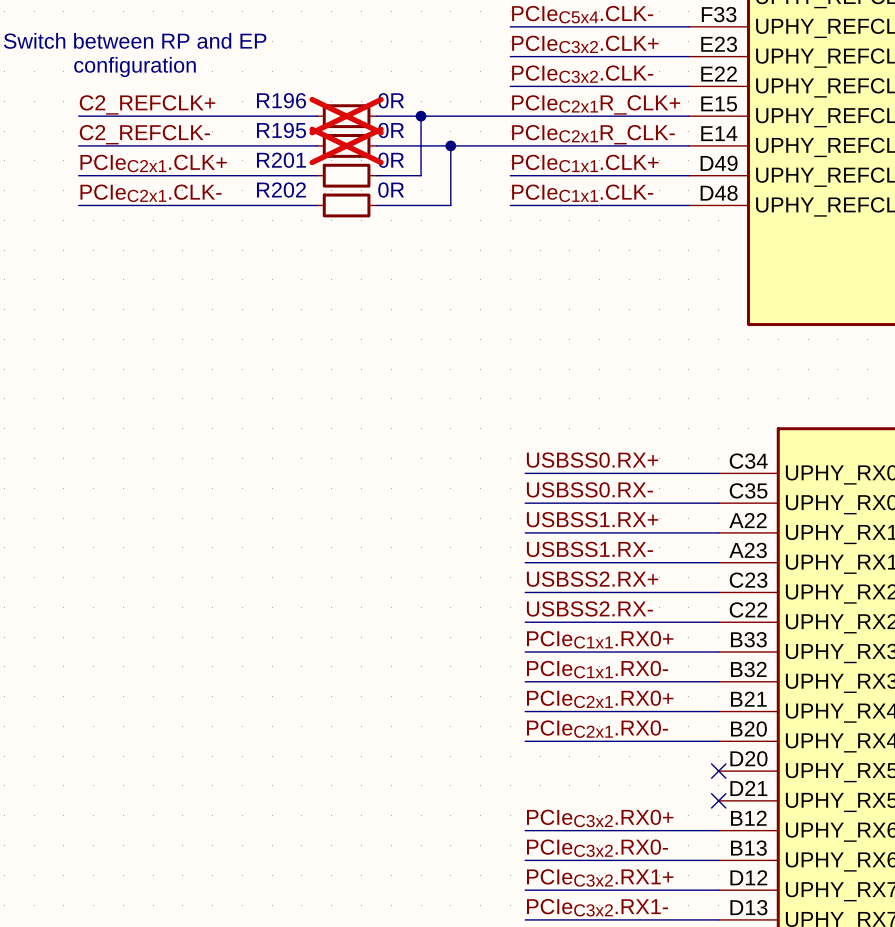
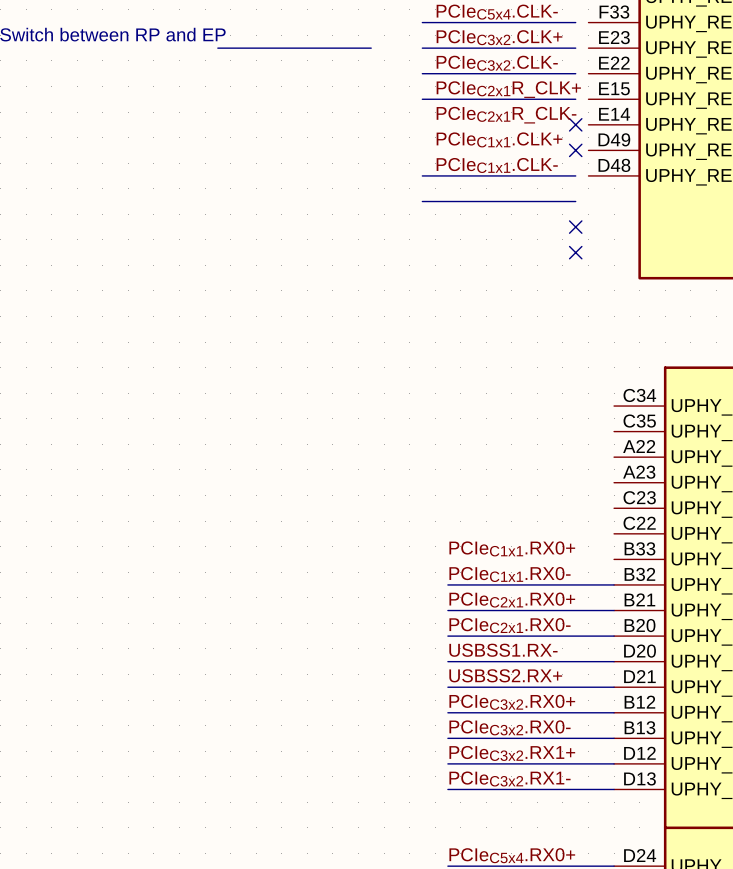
wire: (674, 26) (688, 26) -> (422, 22) (435, 22)
wire: none -> (217, 48) (371, 48)
wire: (674, 56) (688, 56) -> (422, 48) (435, 48)
text: configuration (135, 66) -> none
wire: (674, 86) (688, 86) -> (422, 73) (435, 73)
label: C2_REFCLK+ (147, 104) -> none
wire: (78, 116) (316, 116) -> none
R196: (346, 116) -> none
wire: (376, 116) (495, 116) -> none
wire: (421, 116) (421, 175) (376, 175) -> none
junction: (421, 116) -> none
wire: (674, 116) (688, 116) -> none
label: C2_REFCLK- (144, 134) -> none
wire: (78, 145) (316, 145) -> none
R195: (346, 145) -> none
wire: (376, 145) (688, 145) -> none
wire: (450, 145) (450, 205) (376, 205) -> none
junction: (450, 145) -> none
no-connect mark: none -> (575, 124)
label: PCIeC2x1.CLK+ (153, 163) -> none
wire: (78, 175) (316, 175) -> none
R201: (346, 175) -> none
wire: (510, 175) (688, 175) -> (422, 201) (575, 201)
no-connect mark: none -> (575, 150)
label: PCIeC2x1.CLK- (150, 193) -> none
wire: (78, 205) (316, 205) -> none
R202: (346, 205) -> none
wire: (674, 205) (688, 205) -> (422, 175) (435, 175)
no-connect mark: none -> (575, 227)
no-connect mark: none -> (575, 252)
label: USBSS0.RX+ (592, 460) -> none
wire: (525, 473) (718, 473) -> none
label: USBSS0.RX- (589, 489) -> none
wire: (525, 503) (718, 503) -> none
label: USBSS1.RX+ (592, 519) -> none
wire: (525, 532) (718, 532) -> none
label position: USBSS1.RX- (589, 549) -> USBSS1.RX- (503, 650)
wire: (525, 562) (718, 562) -> none
label position: USBSS2.RX+ (592, 579) -> USBSS2.RX+ (505, 675)
wire: (525, 592) (718, 592) -> none
label: USBSS2.RX- (589, 608) -> none
wire: (525, 622) (718, 622) -> (447, 661) (614, 661)
wire: (525, 652) (718, 652) -> (447, 687) (614, 687)
no-connect mark: (718, 771) -> none
no-connect mark: (718, 800) -> none

